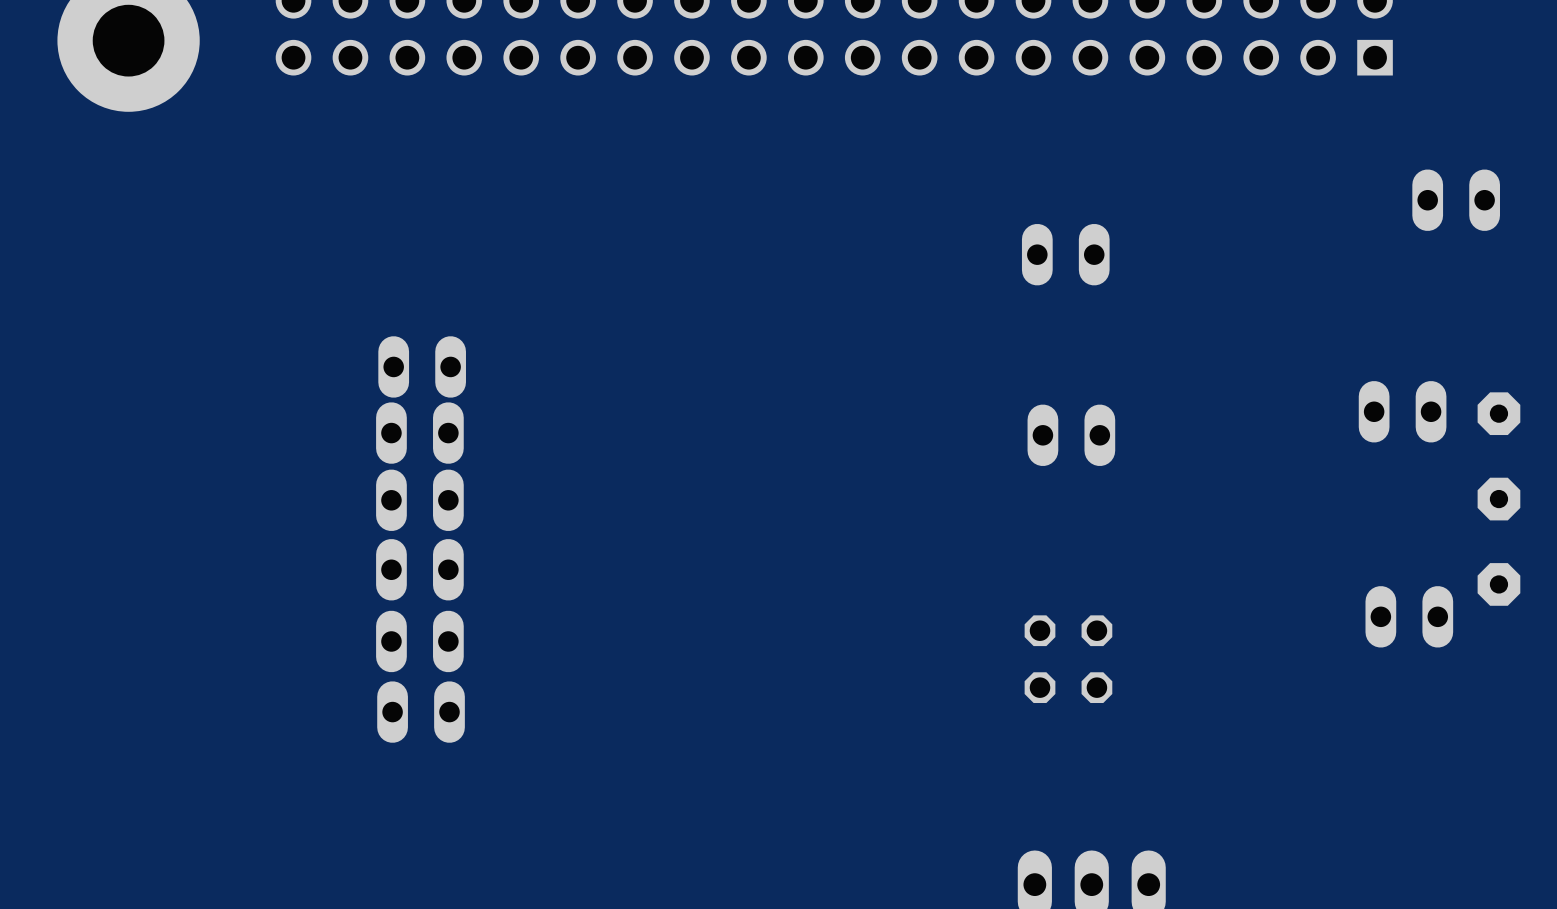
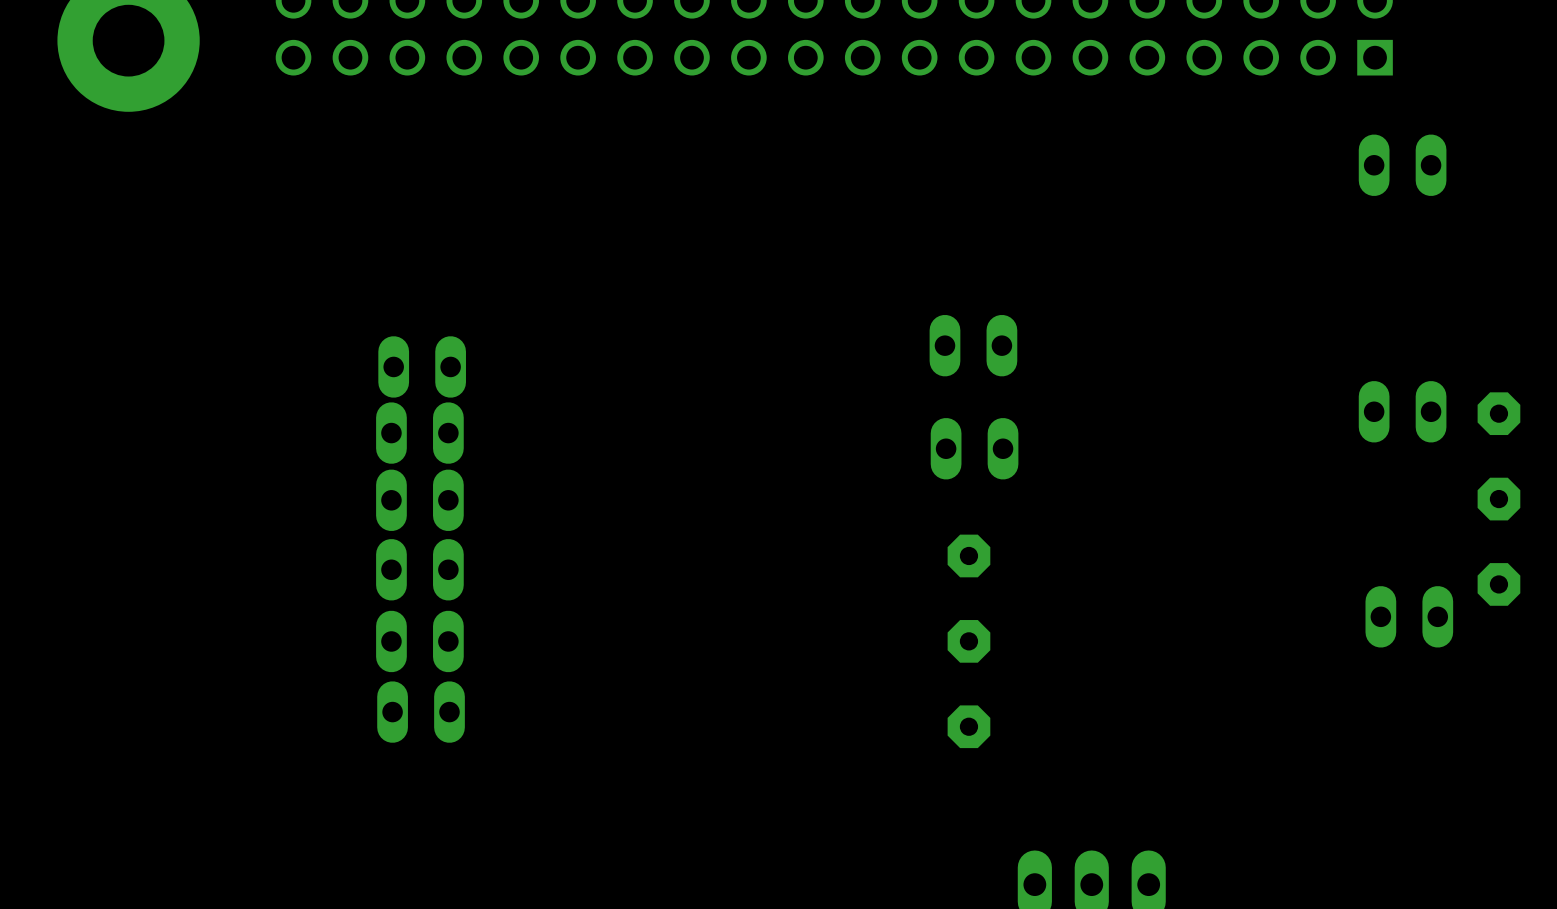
part position: (1456, 200) -> (1402, 165)
part: (1065, 254) -> none
part: none -> (973, 345)
part: (1071, 435) -> none
part: none -> (974, 448)
part: none -> (968, 641)
part: (1068, 659) -> none

